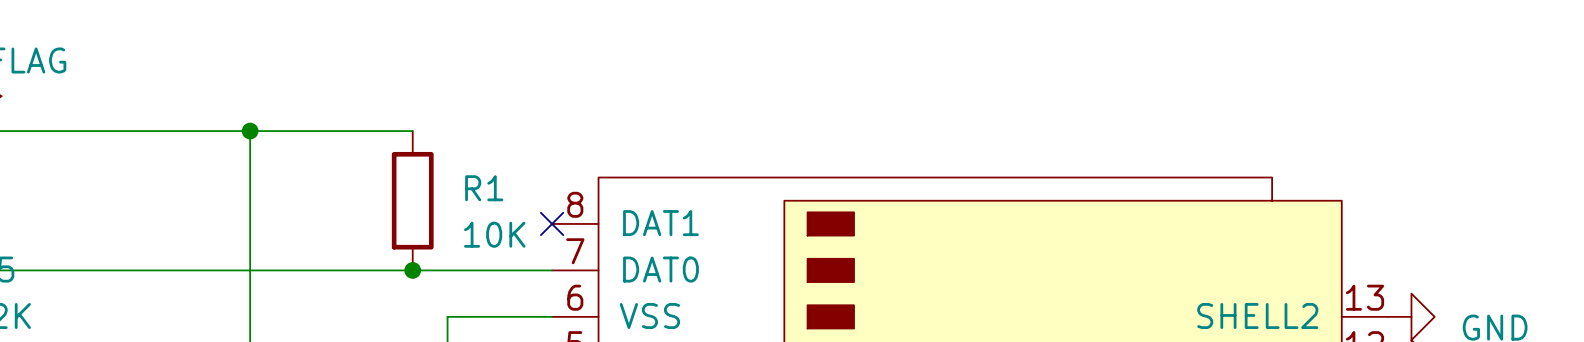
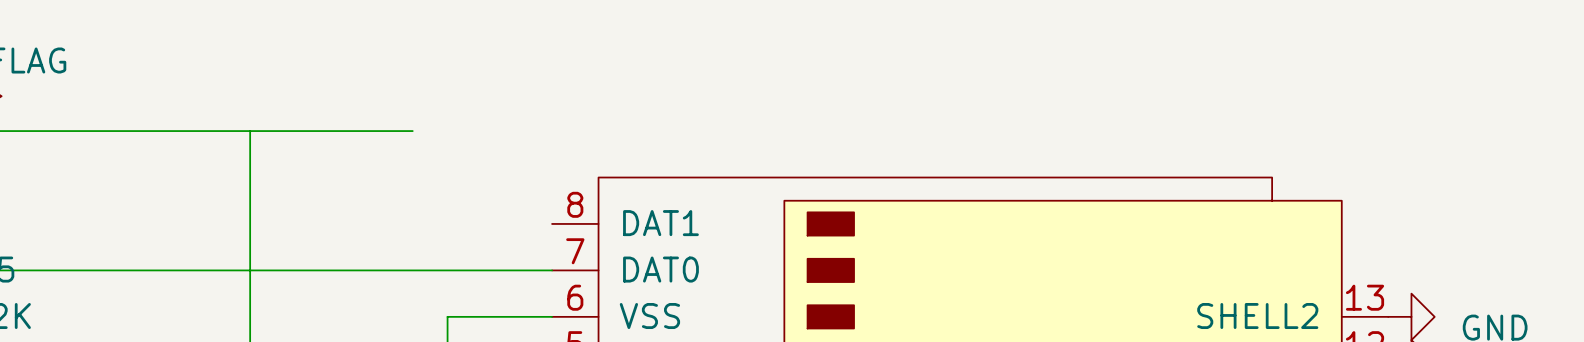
junction: (250, 131) -> none
R1: 10K (412, 200) -> none
no-connect mark: (552, 223) -> none
junction: (412, 270) -> none

